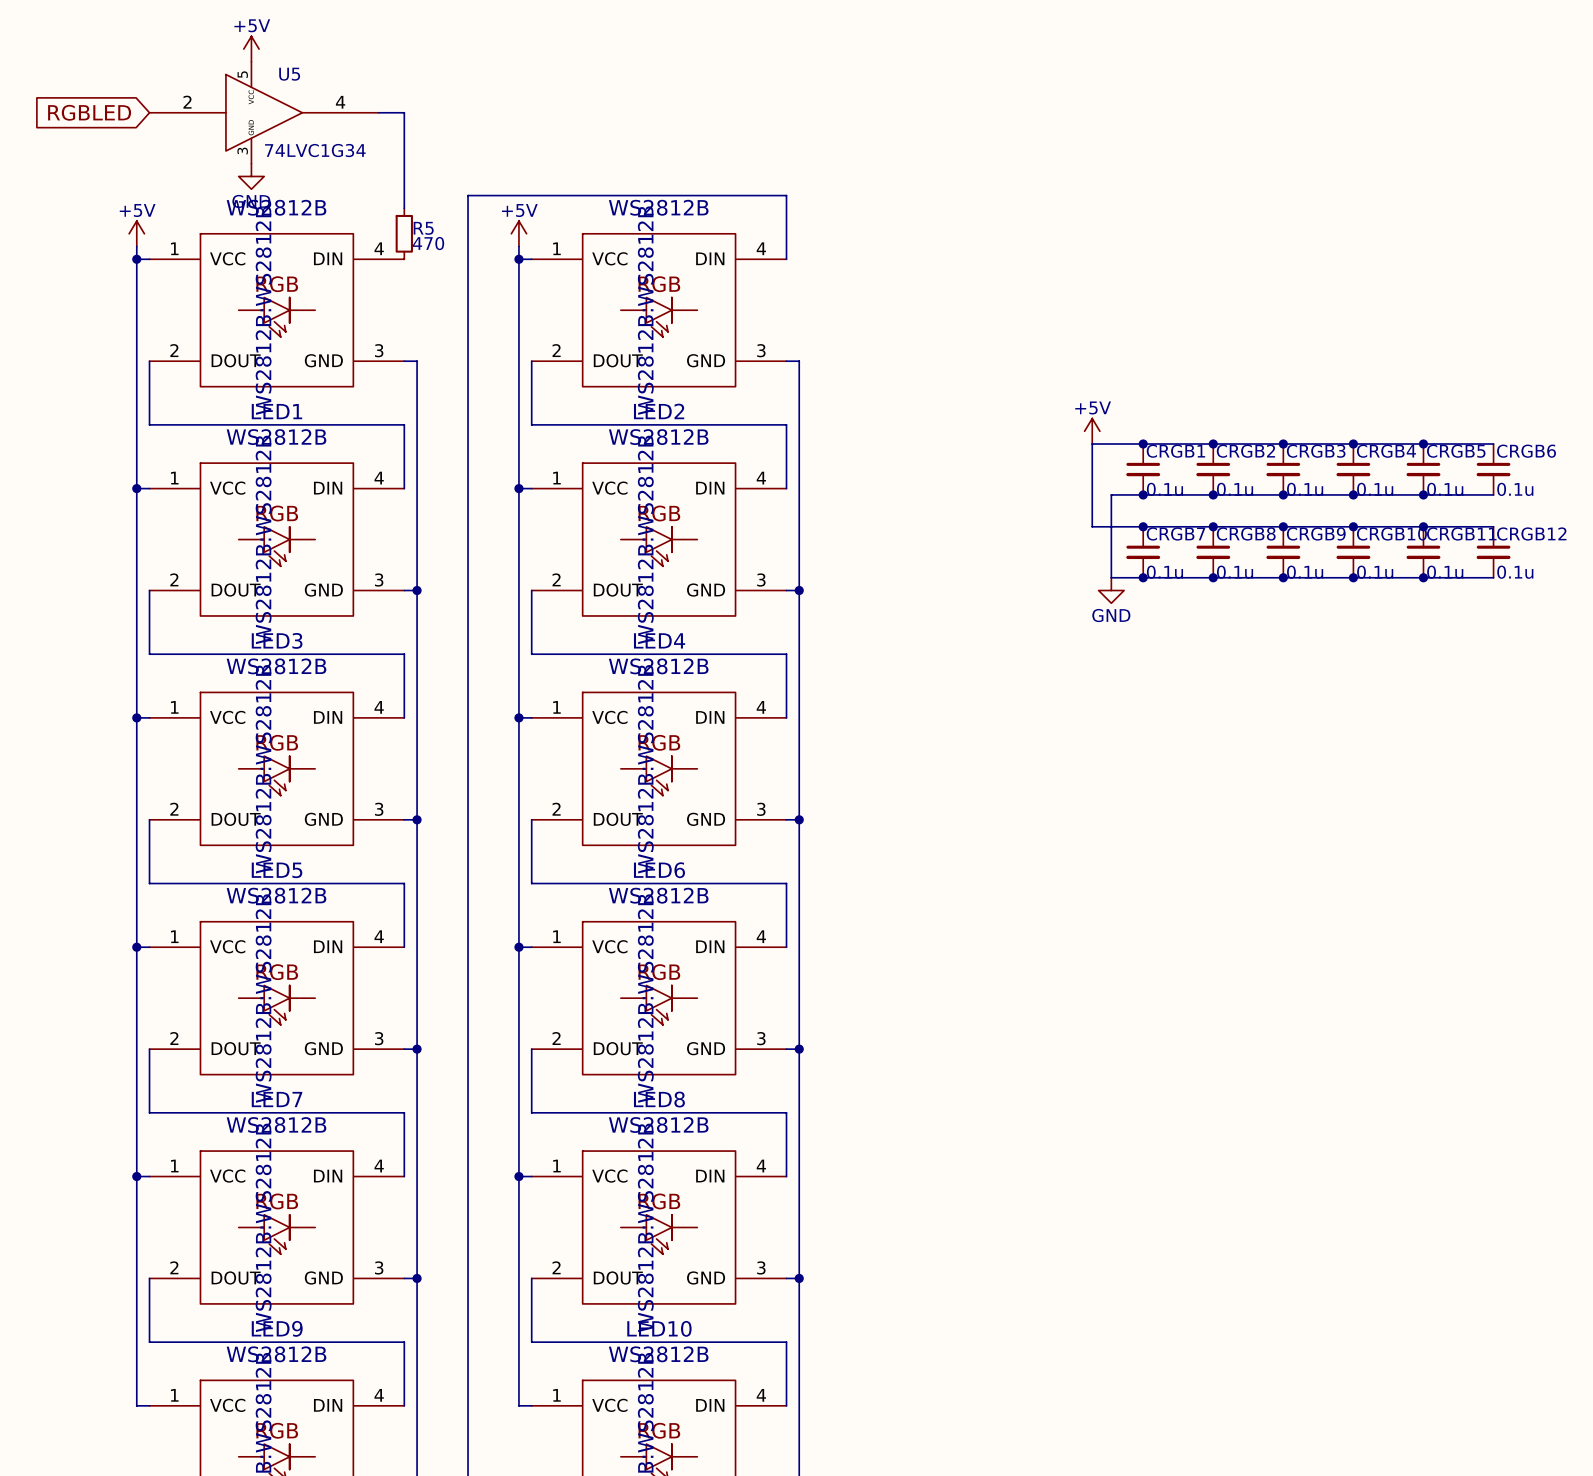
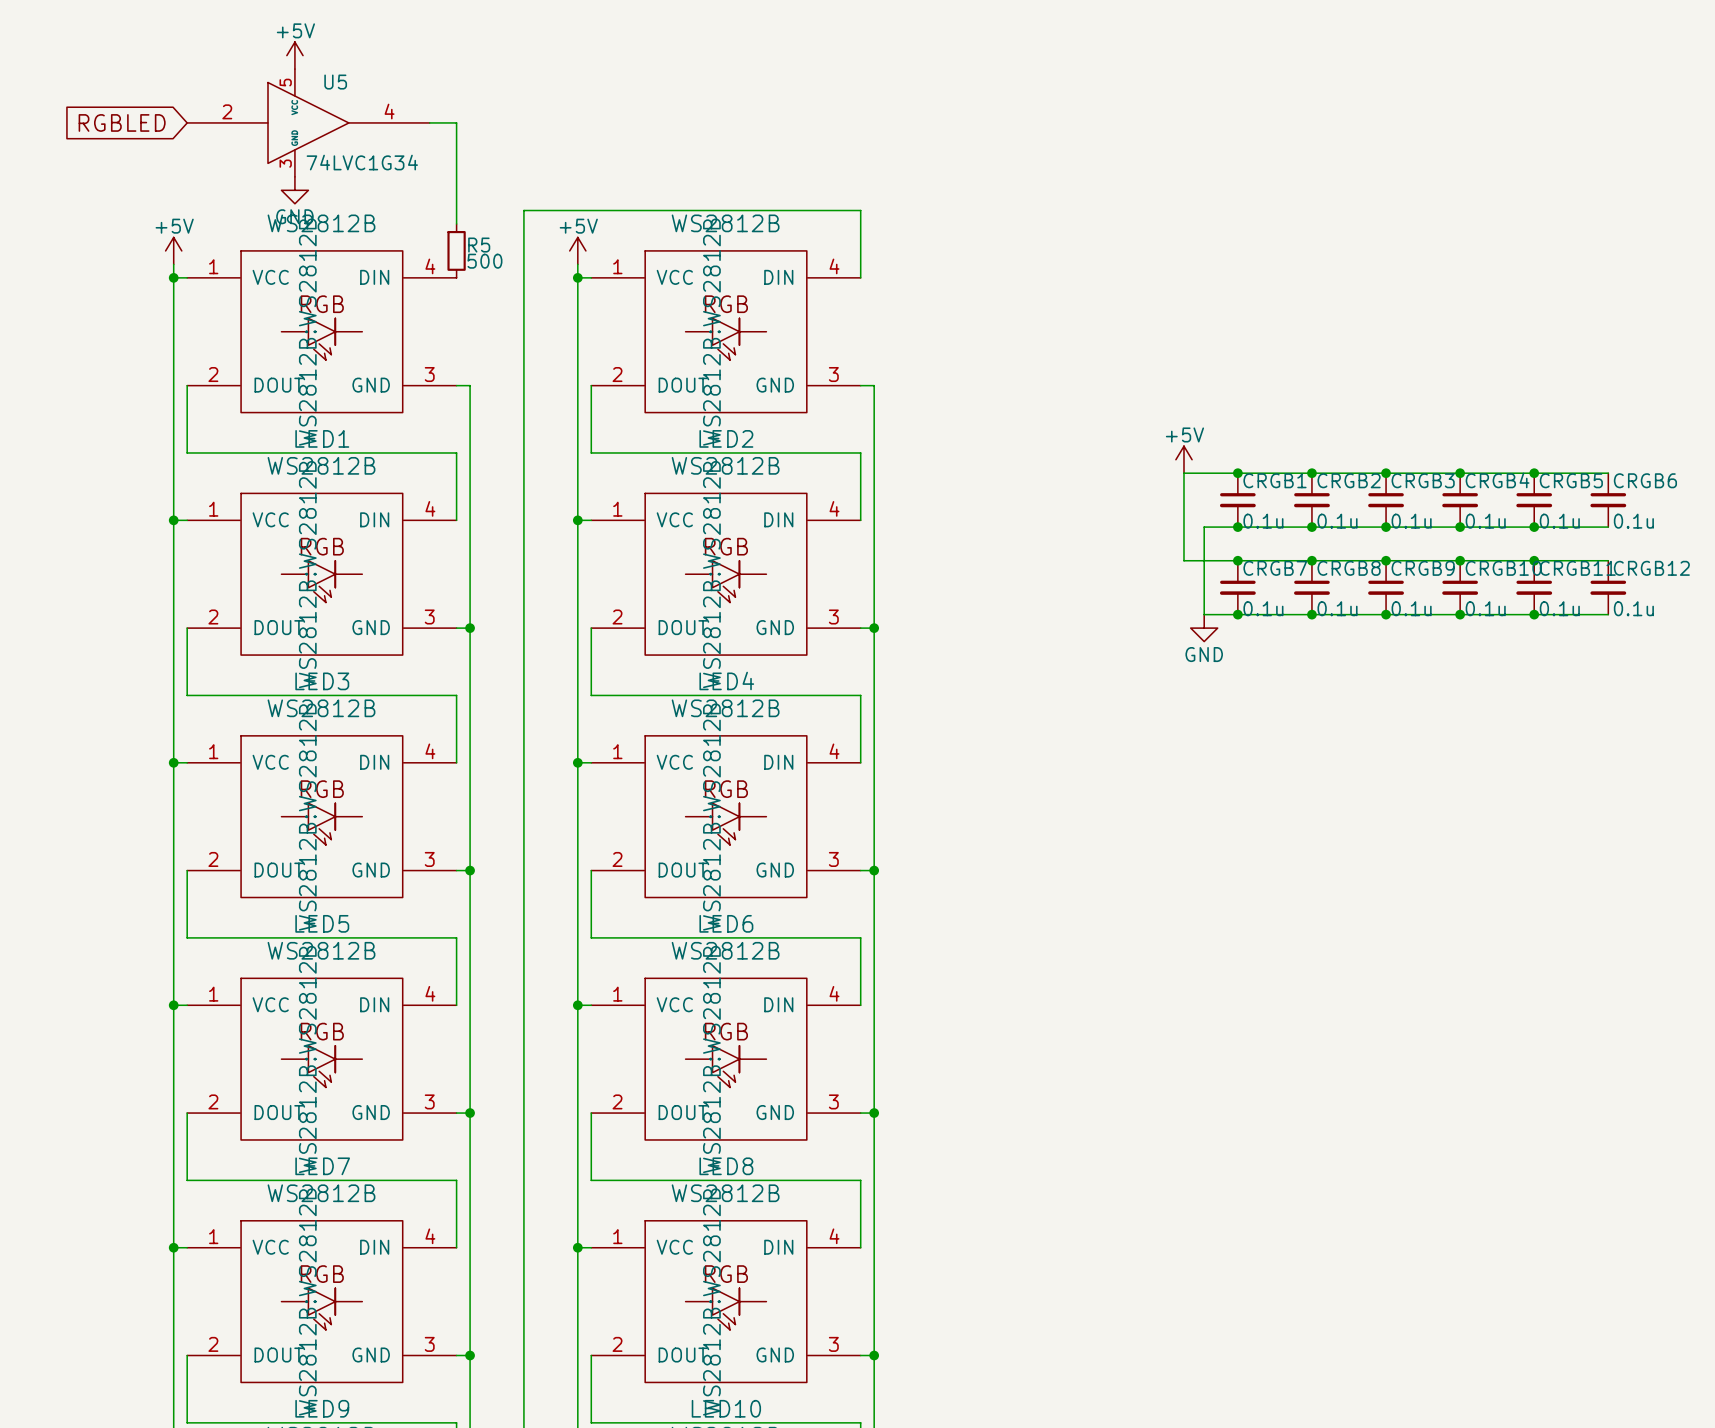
R5 value: 470 (428, 243) -> 500 (484, 261)

